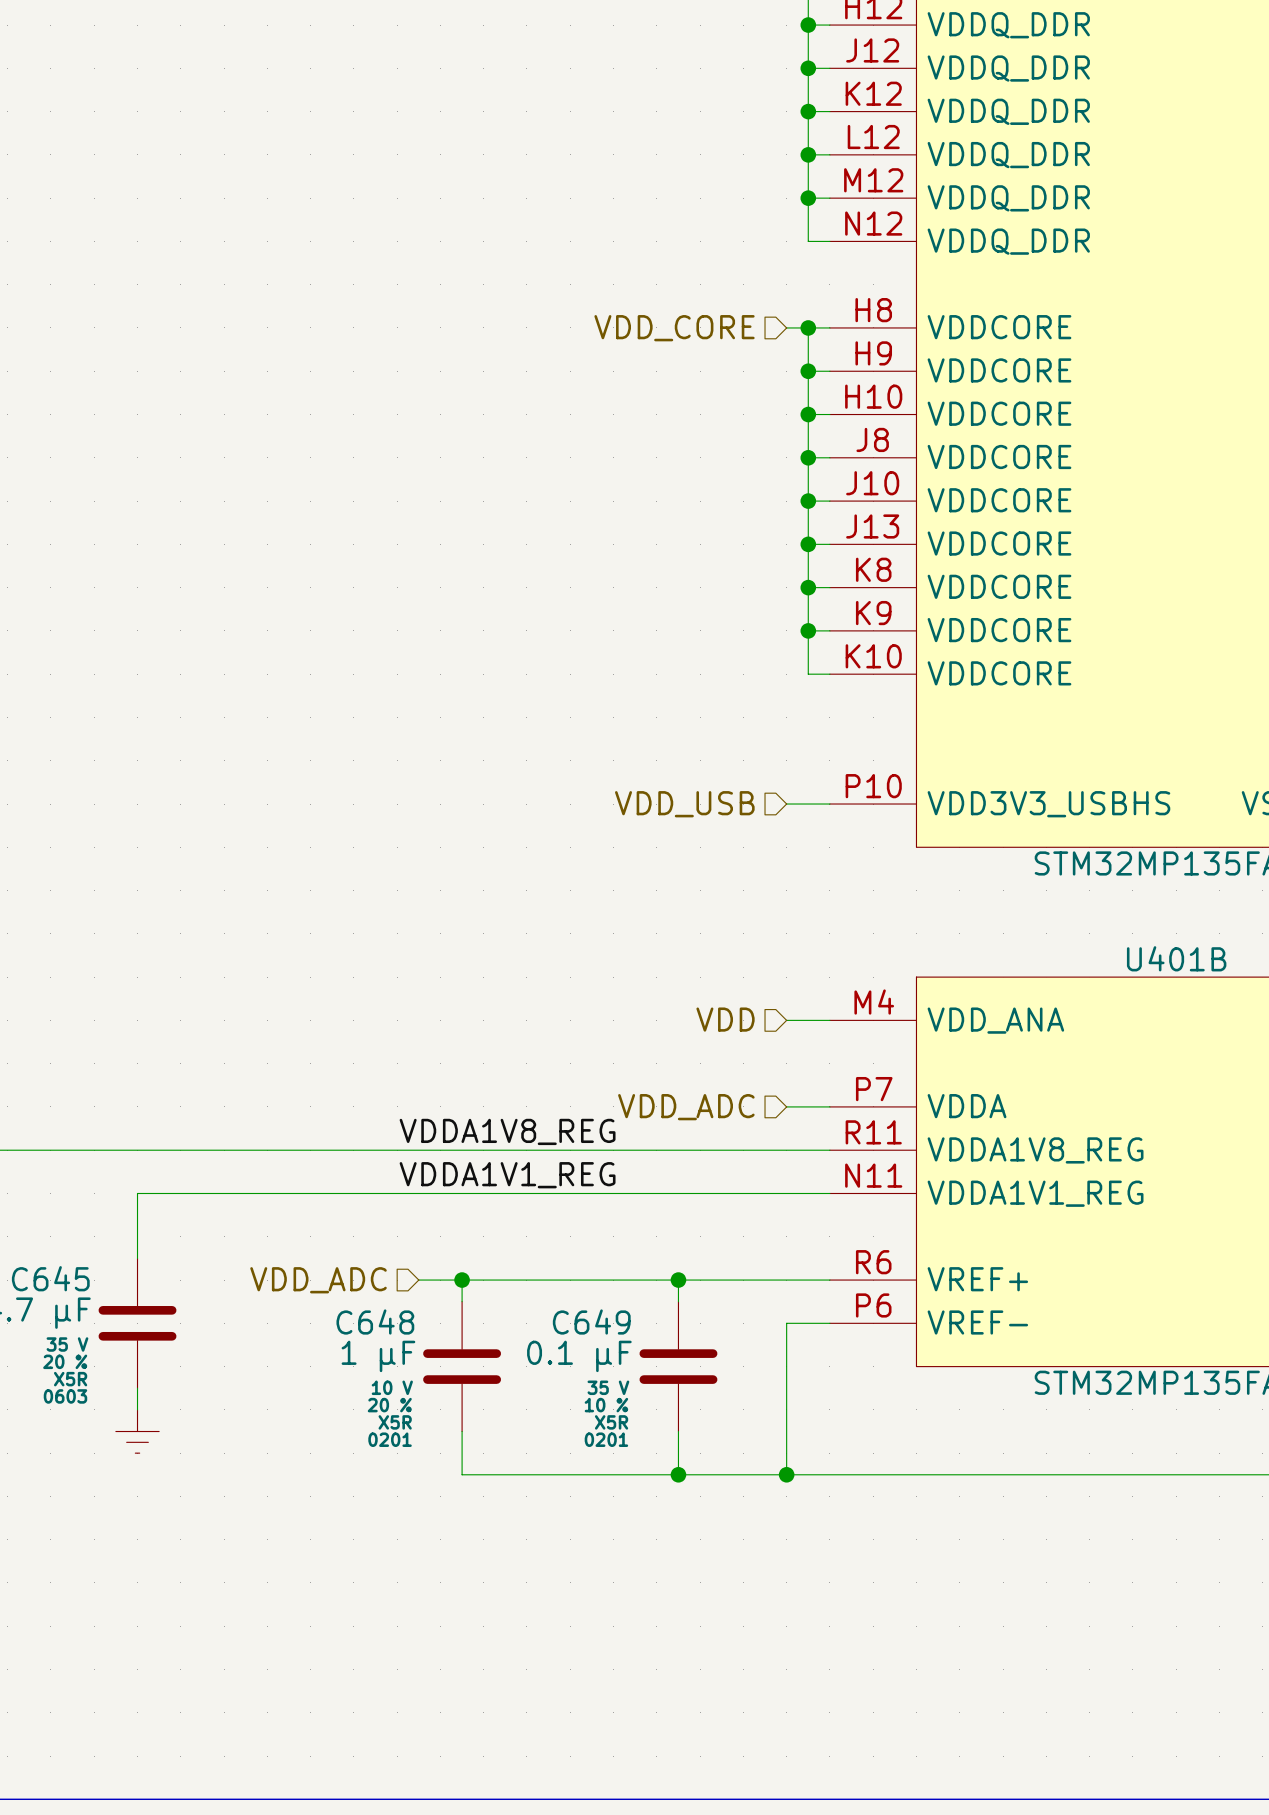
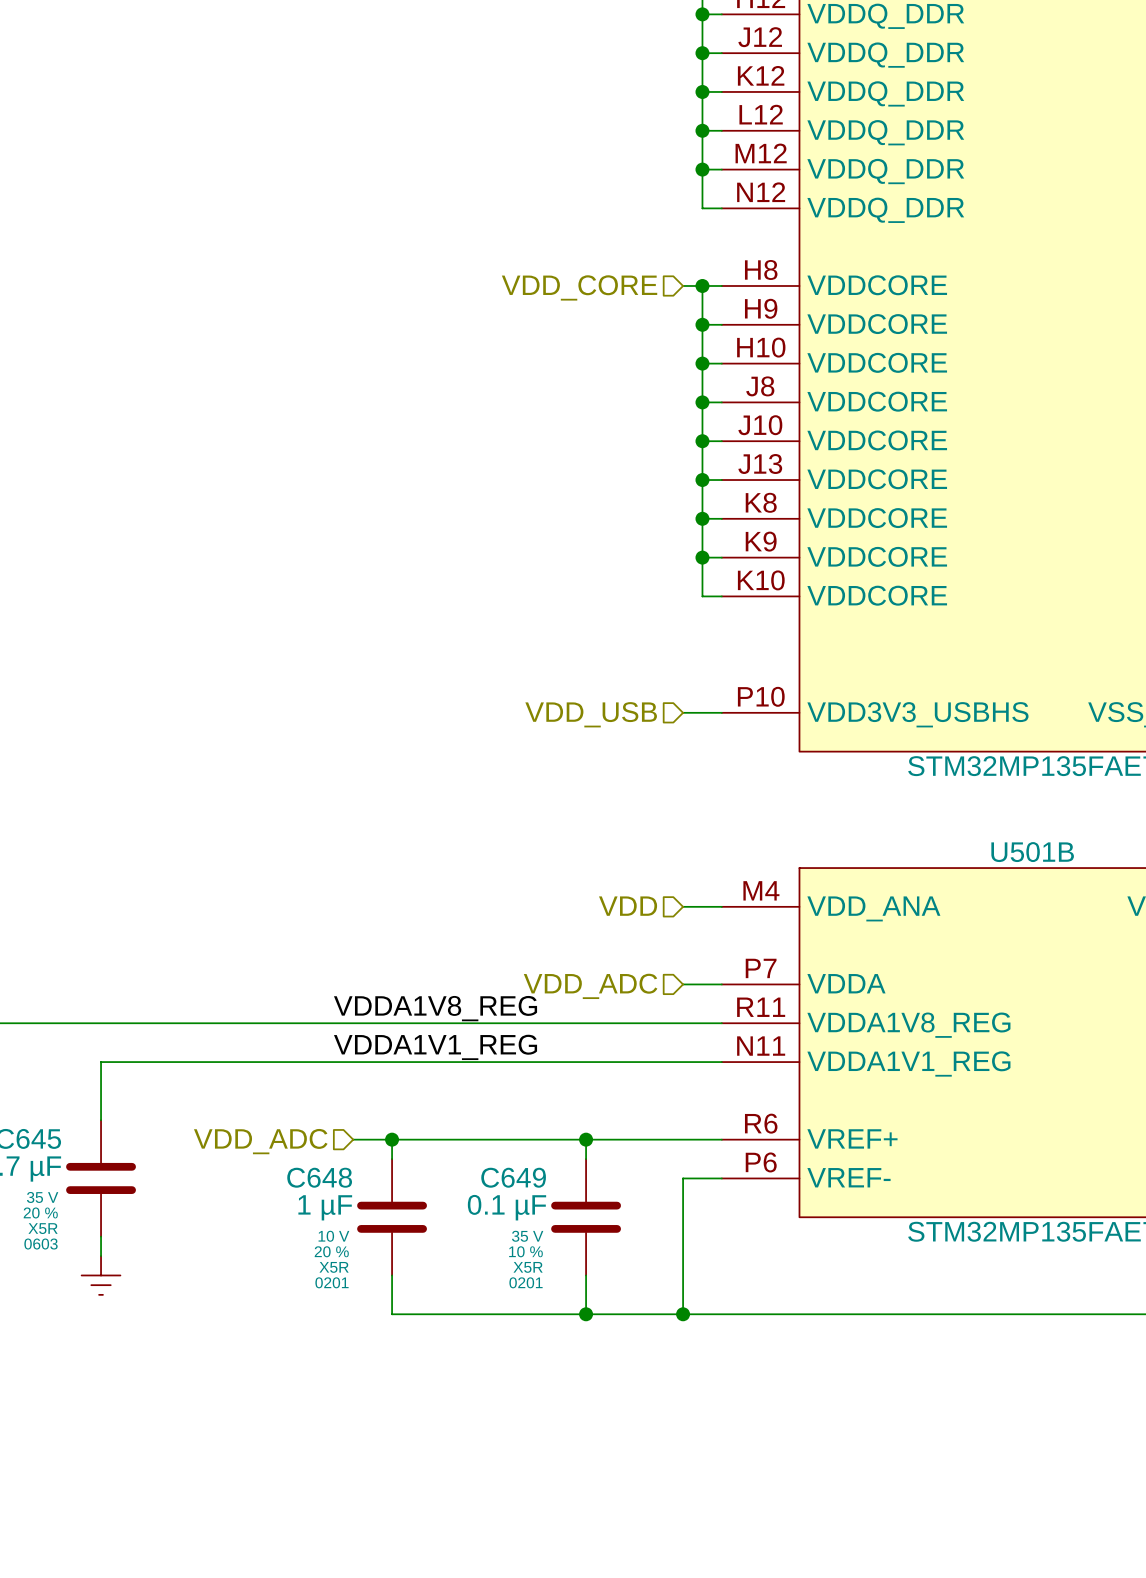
U401B name: U401B (1176, 958) -> U501B (1032, 852)

